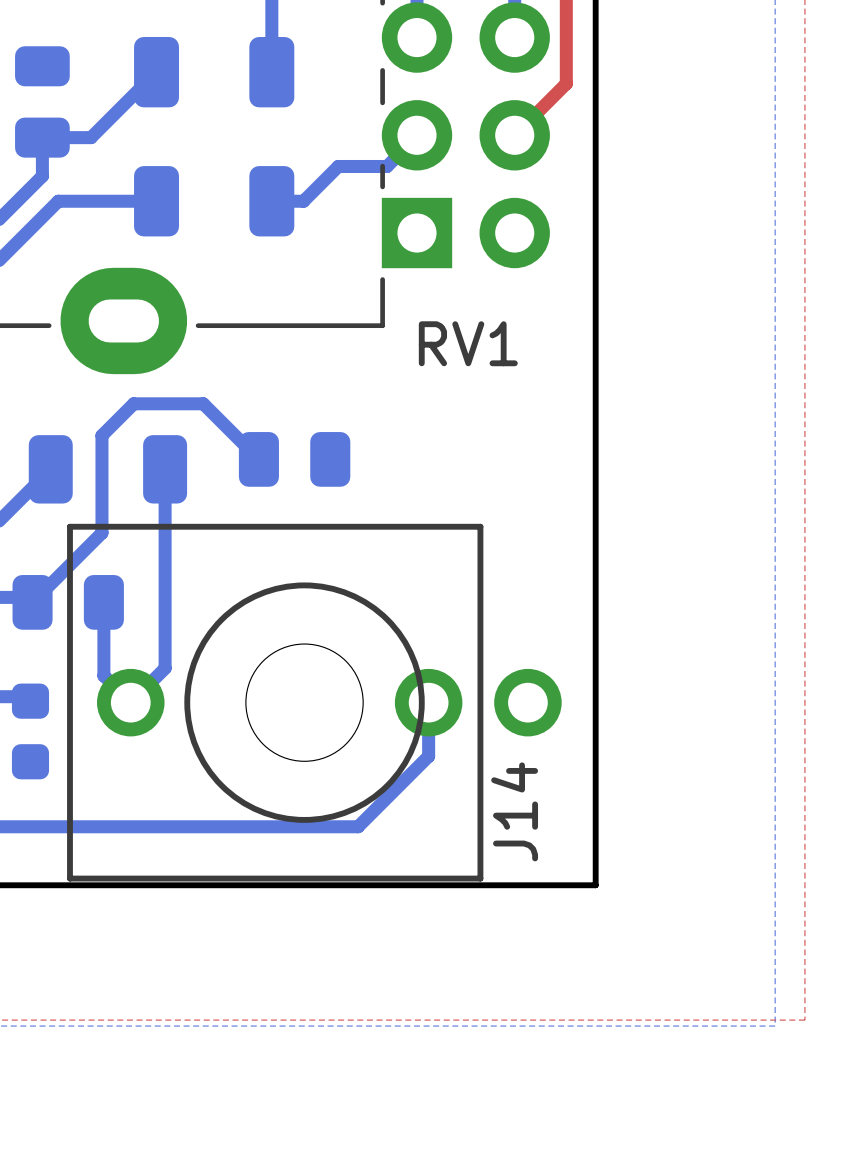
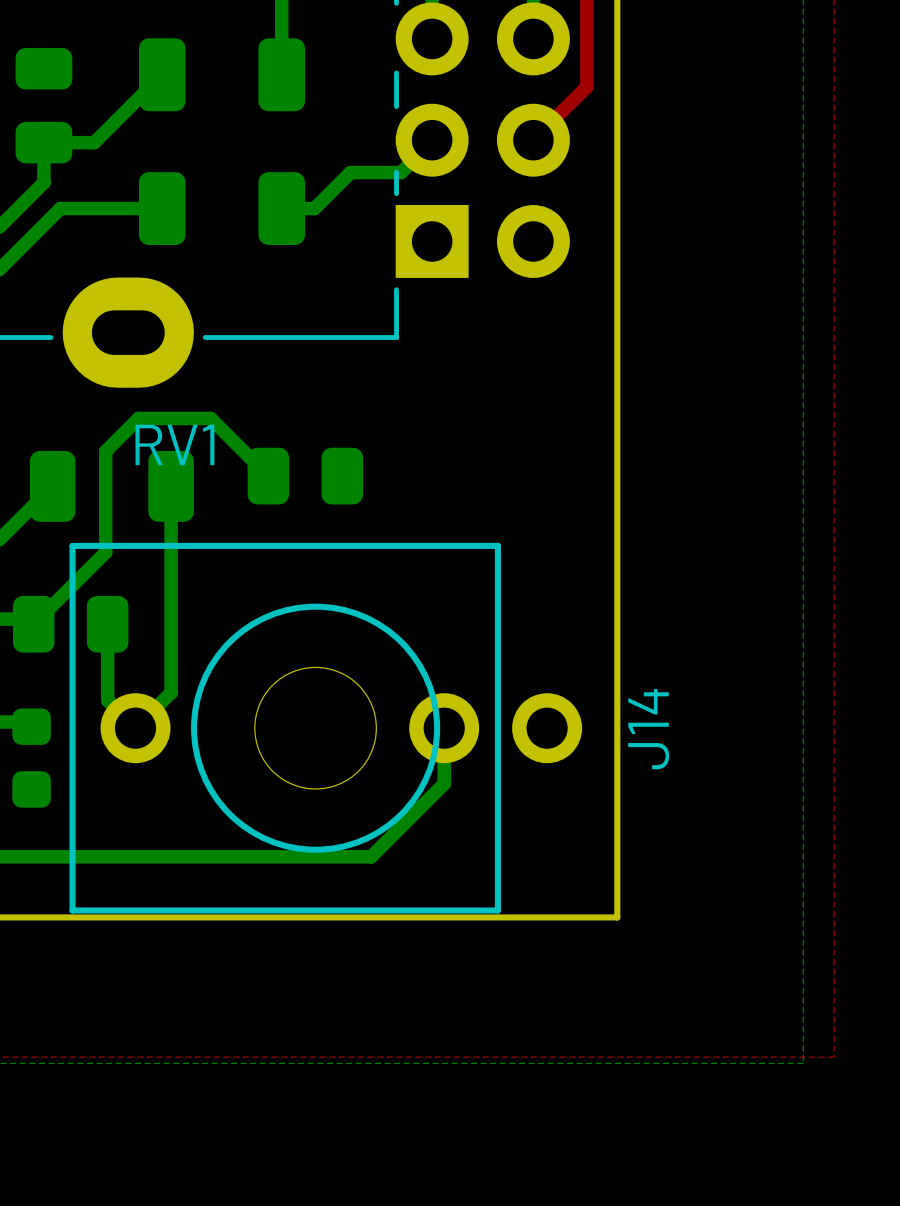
RV1 name position: RV1 (468, 343) -> RV1 (174, 444)
J14 name position: J14 (514, 811) -> J14 (648, 729)

